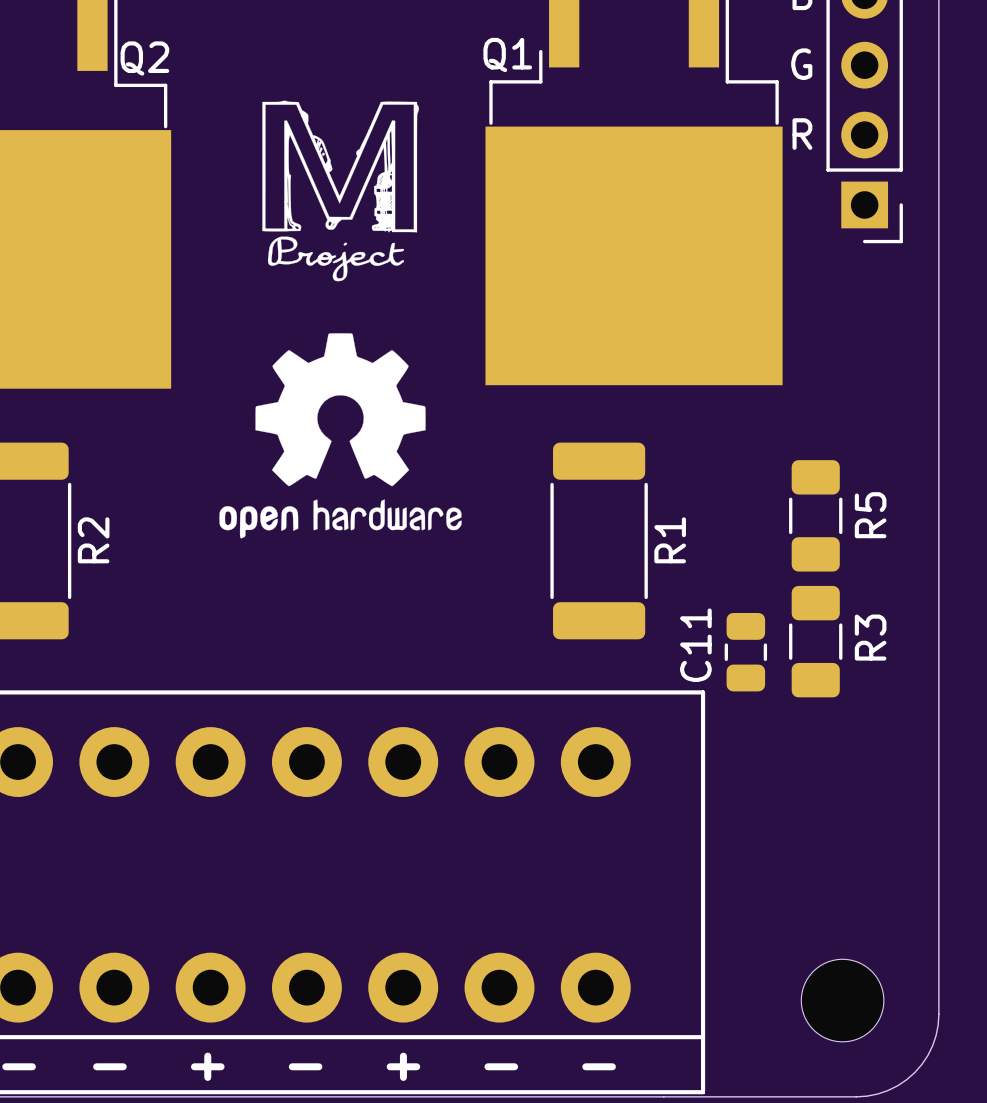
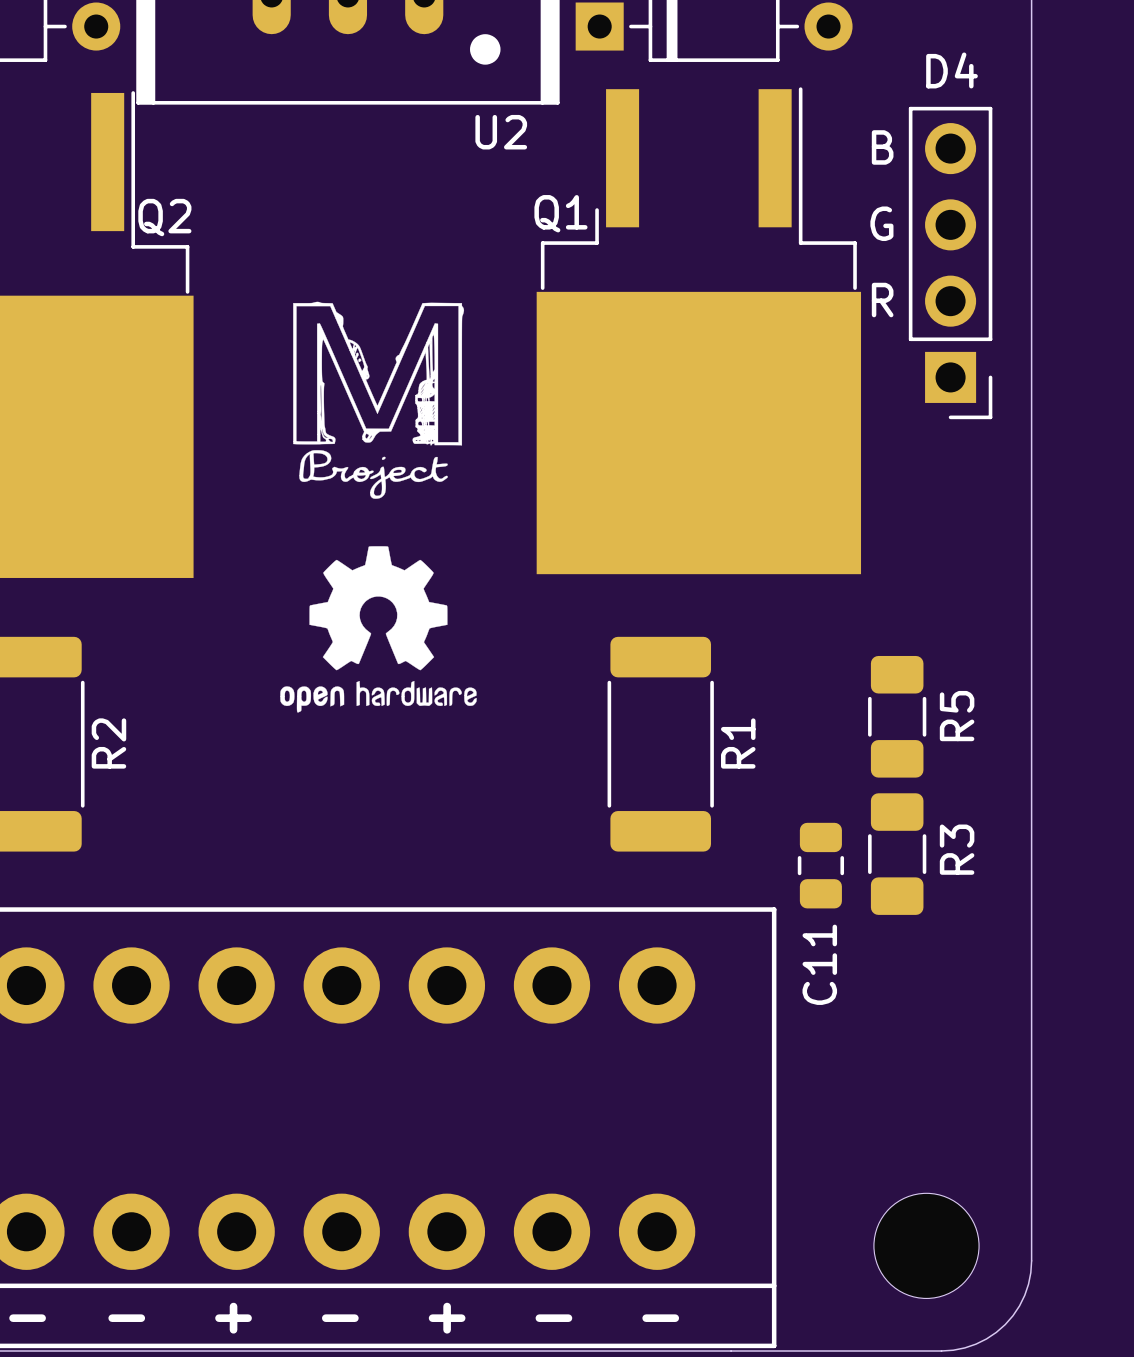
drawing position: (340, 190) -> (378, 400)
drawing shape: [219, 333, 462, 539] -> [280, 546, 477, 713]
C11 name position: C11 (695, 645) -> C11 (819, 964)
part footprint: [801, 959, 884, 1042] -> [873, 1193, 980, 1299]

